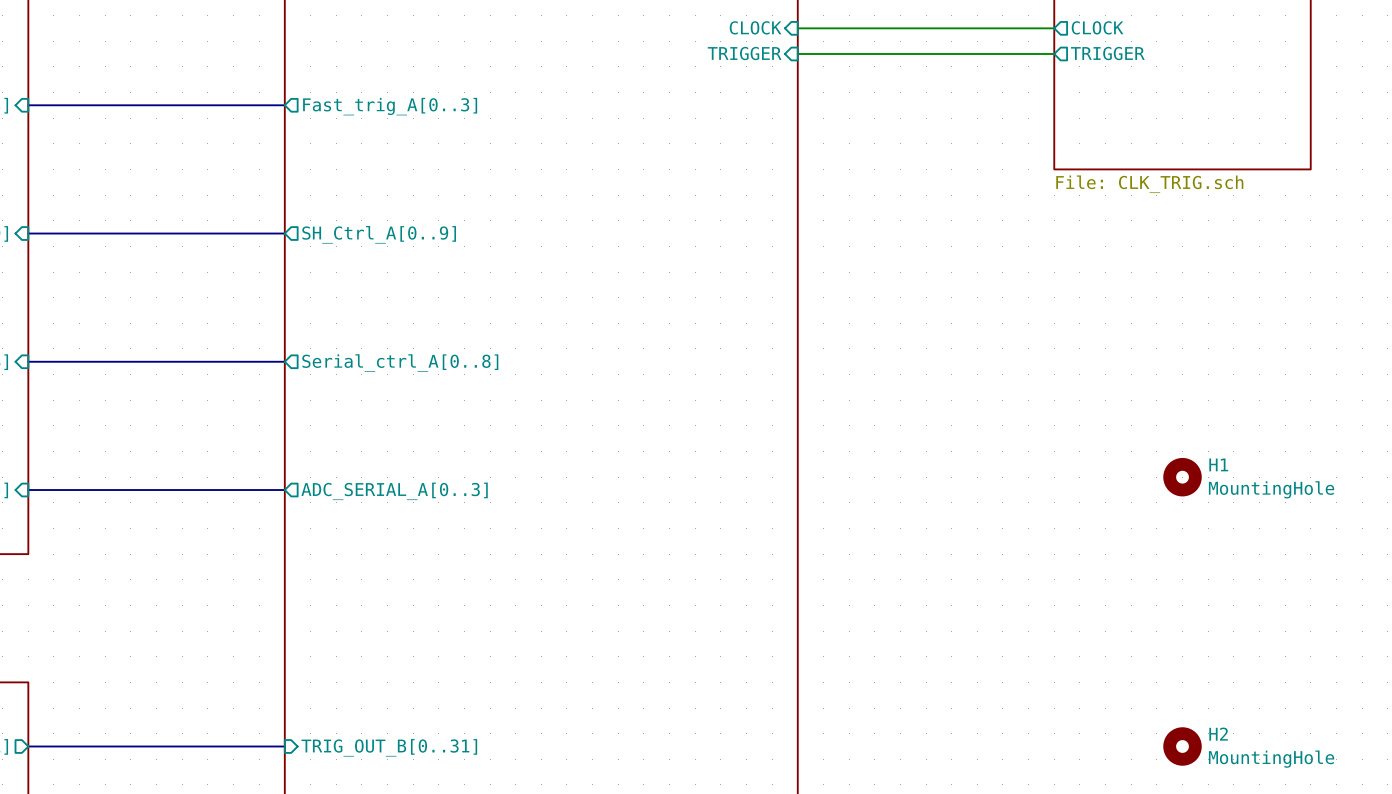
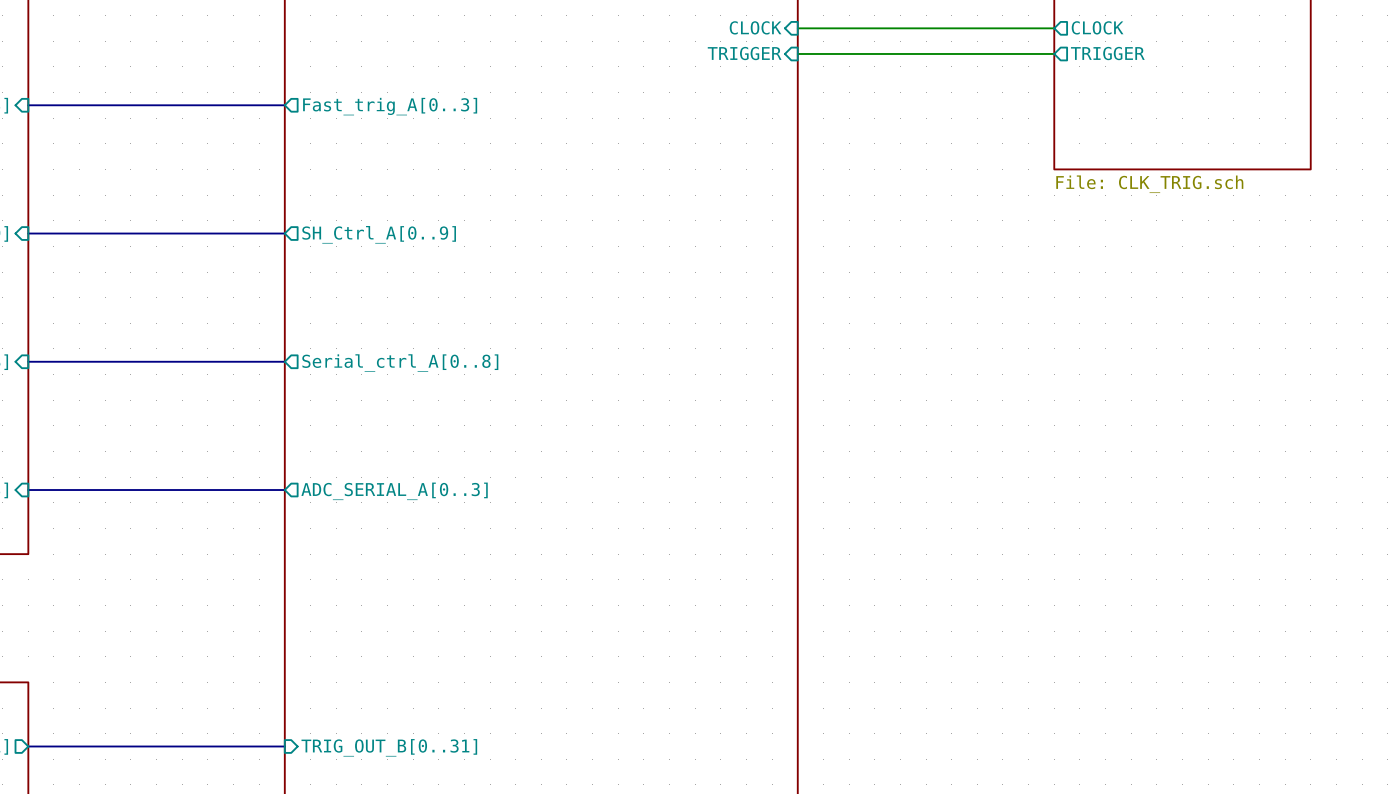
H1: MountingHole (1182, 477) -> none
H2: MountingHole (1182, 746) -> none

